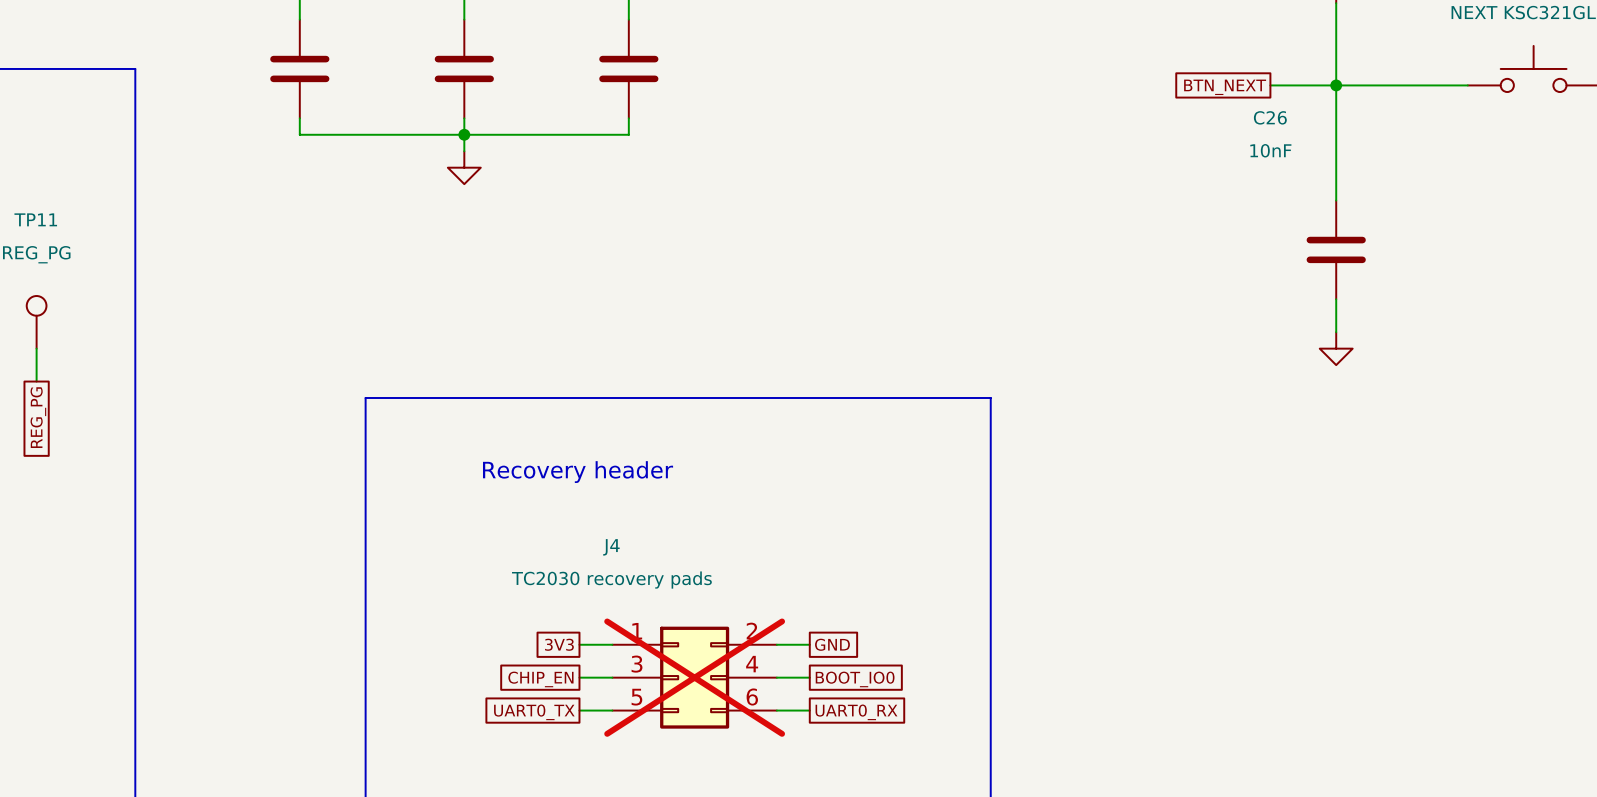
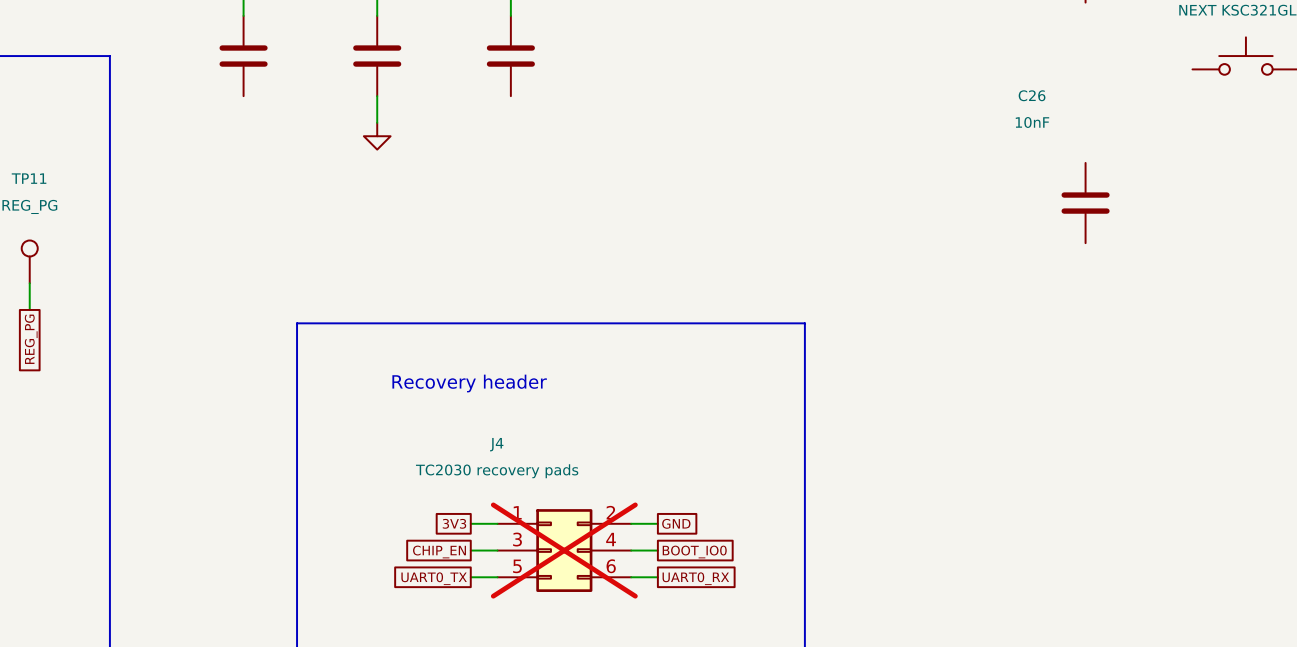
wire: (1336, 3) (1336, 200) -> none
wire: (1270, 85) (1467, 85) -> none
junction: (1336, 85) -> none
global label: BTN_NEXT (1225, 87) -> none
wire: (299, 118) (299, 134) (628, 134) (628, 118) -> none
junction: (464, 134) -> none
wire: (1336, 299) (1336, 332) -> none
power symbol: (1336, 348) -> none

